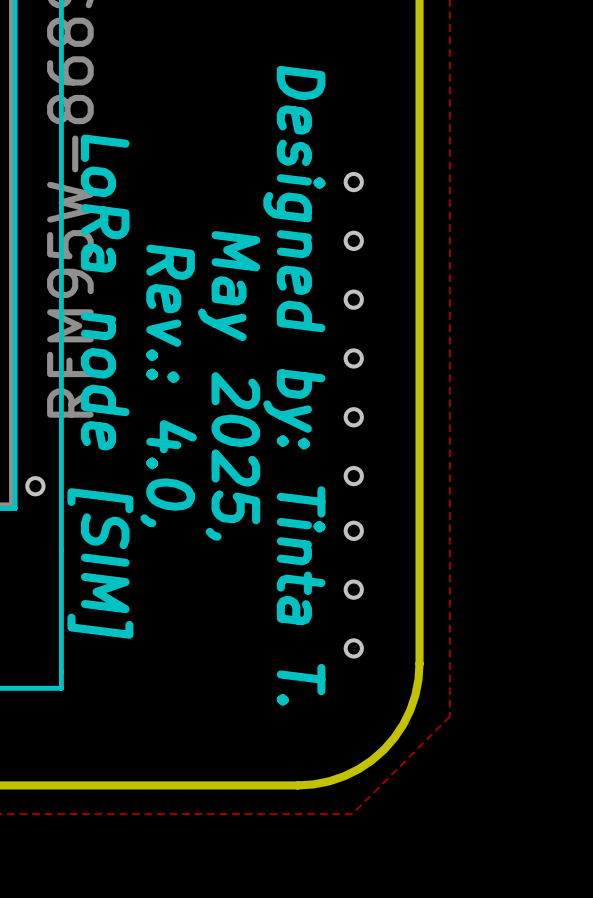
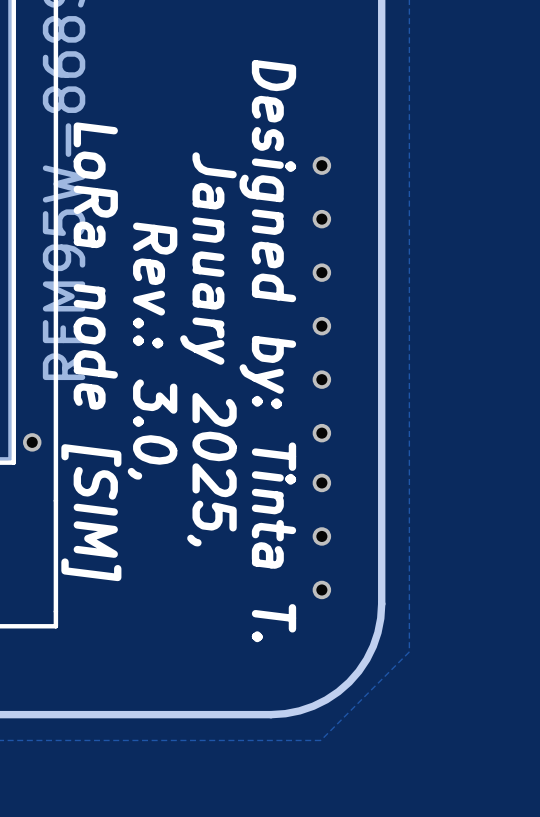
text: Rev.: 4.0, (168, 385) -> Rev.: 3.0, (152, 351)
text: May 2025, (229, 385) -> January 2025, (208, 349)

